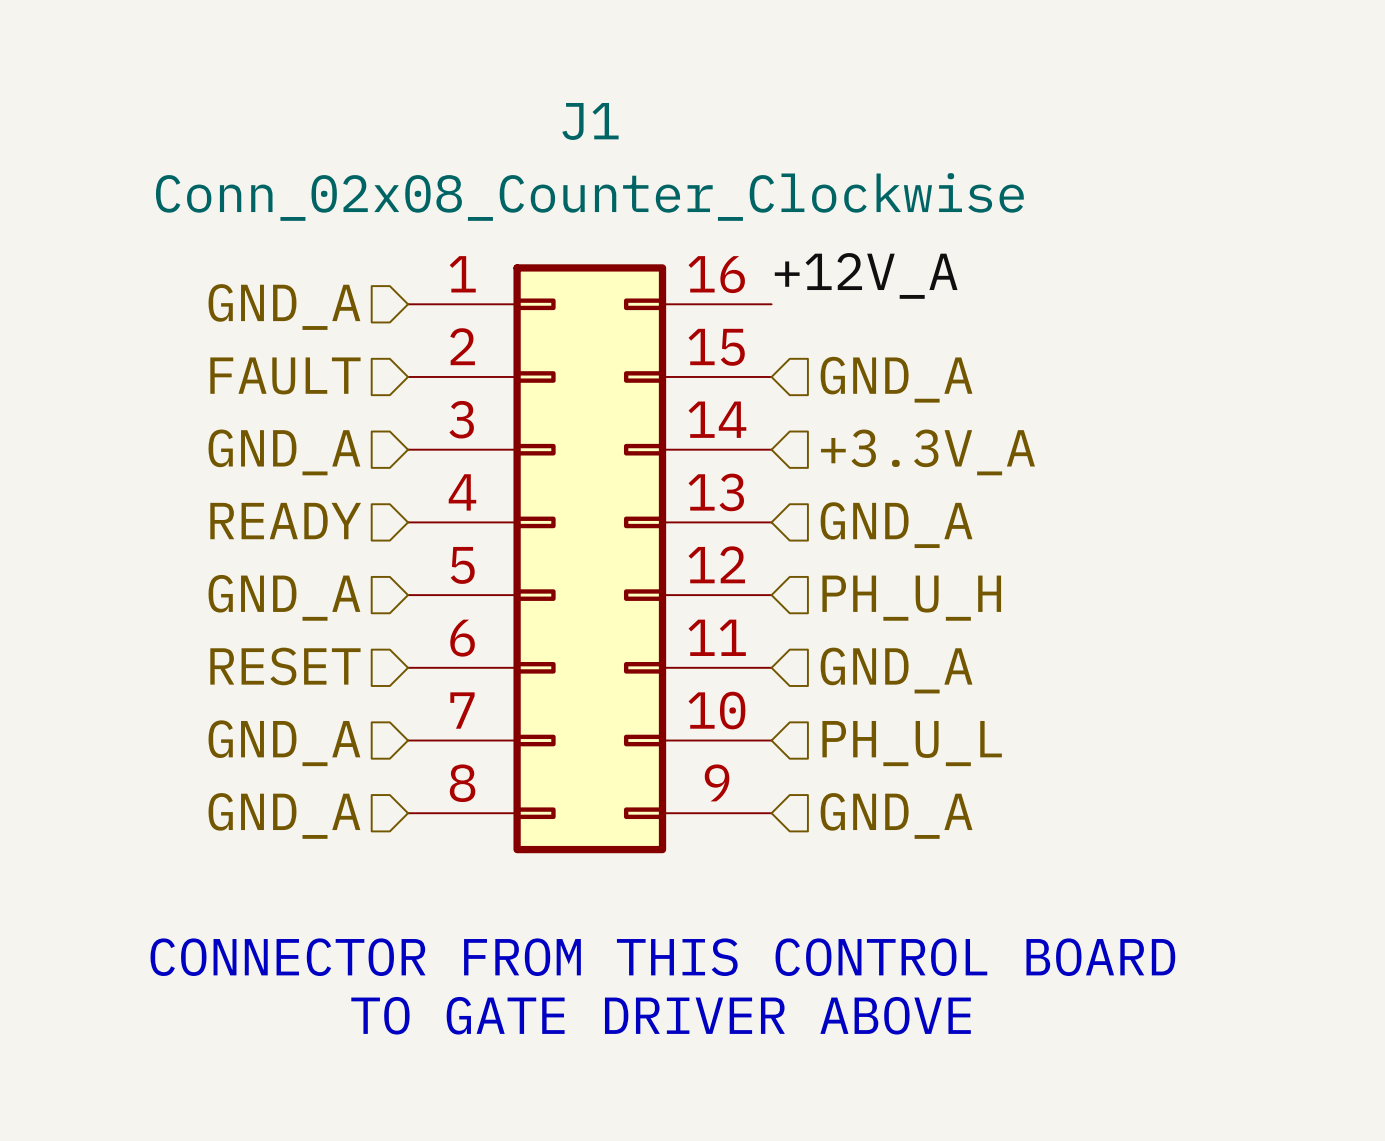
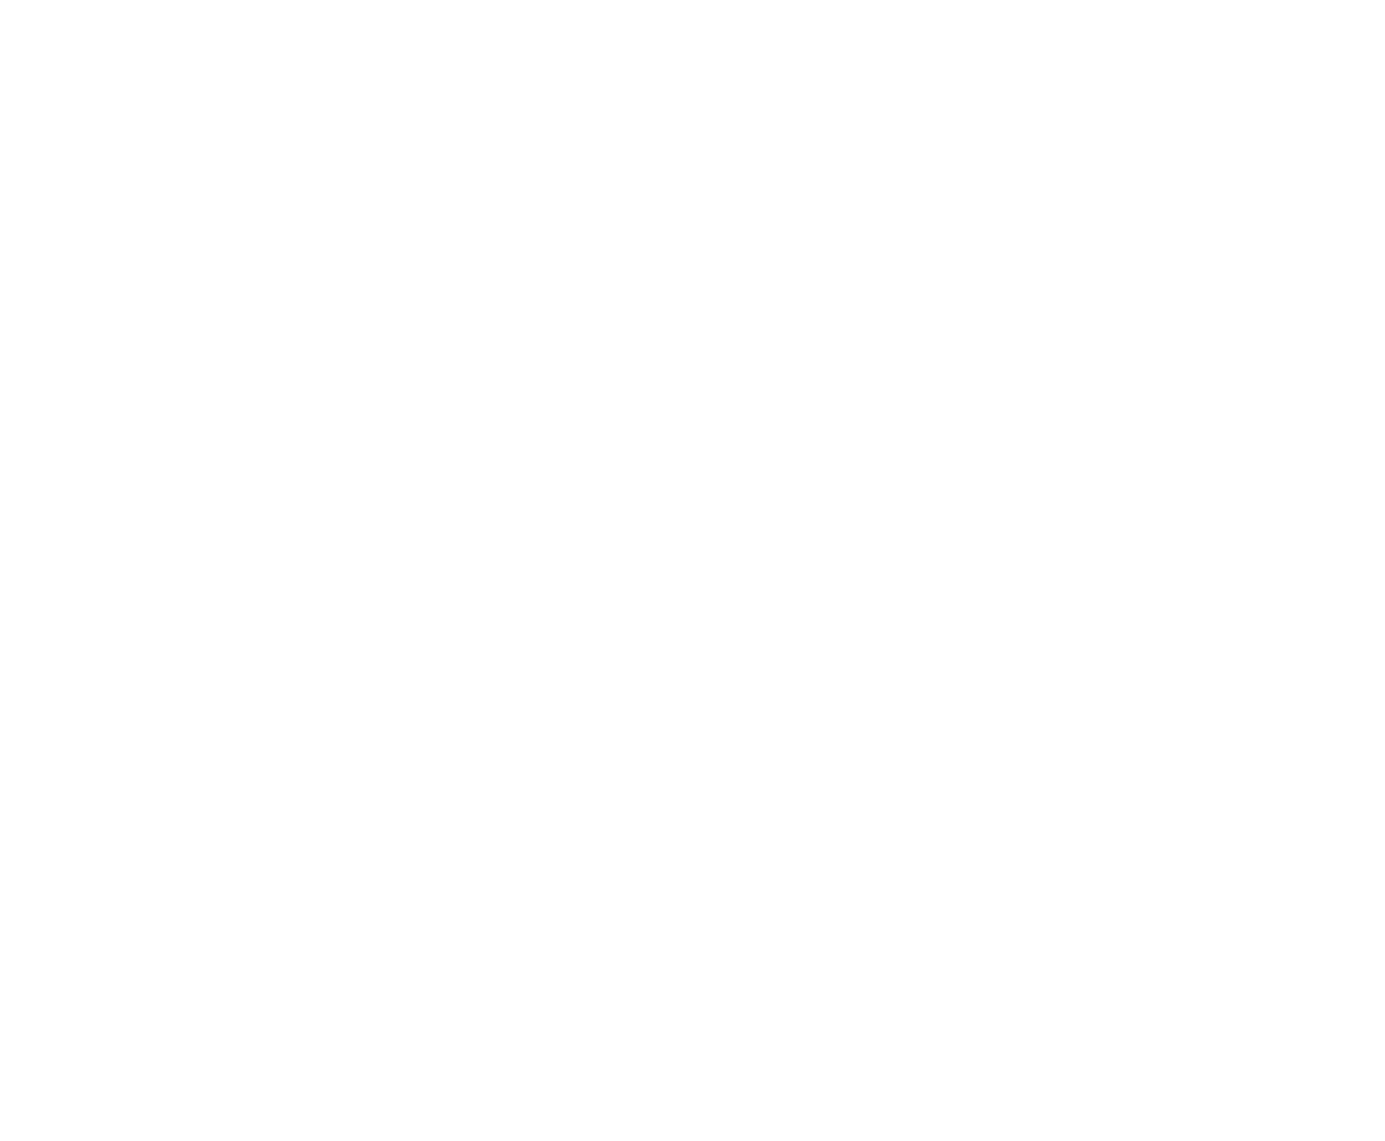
label: +12V_A (866, 275) -> none
hierarchical label: GND_A (284, 307) -> none
hierarchical label: FAULT (285, 375) -> none
hierarchical label: GND_A (896, 379) -> none
hierarchical label: GND_A (284, 452) -> none
hierarchical label: +3.3V_A (927, 452) -> none
hierarchical label: READY (285, 521) -> none
hierarchical label: GND_A (896, 525) -> none
J1: Conn_02x08_Counter_Clockwise (589, 558) -> none
hierarchical label: GND_A (284, 597) -> none
hierarchical label: PH_U_H (911, 598) -> none
hierarchical label: RESET (285, 666) -> none
hierarchical label: GND_A (896, 670) -> none
hierarchical label: GND_A (284, 743) -> none
hierarchical label: PH_U_L (912, 743) -> none
hierarchical label: GND_A (284, 815) -> none
hierarchical label: GND_A (896, 815) -> none
text: CONNECTOR FROM THIS CONTROL BOARD (662, 957) -> none
text: TO GATE DRIVER ABOVE (661, 1015) -> none

